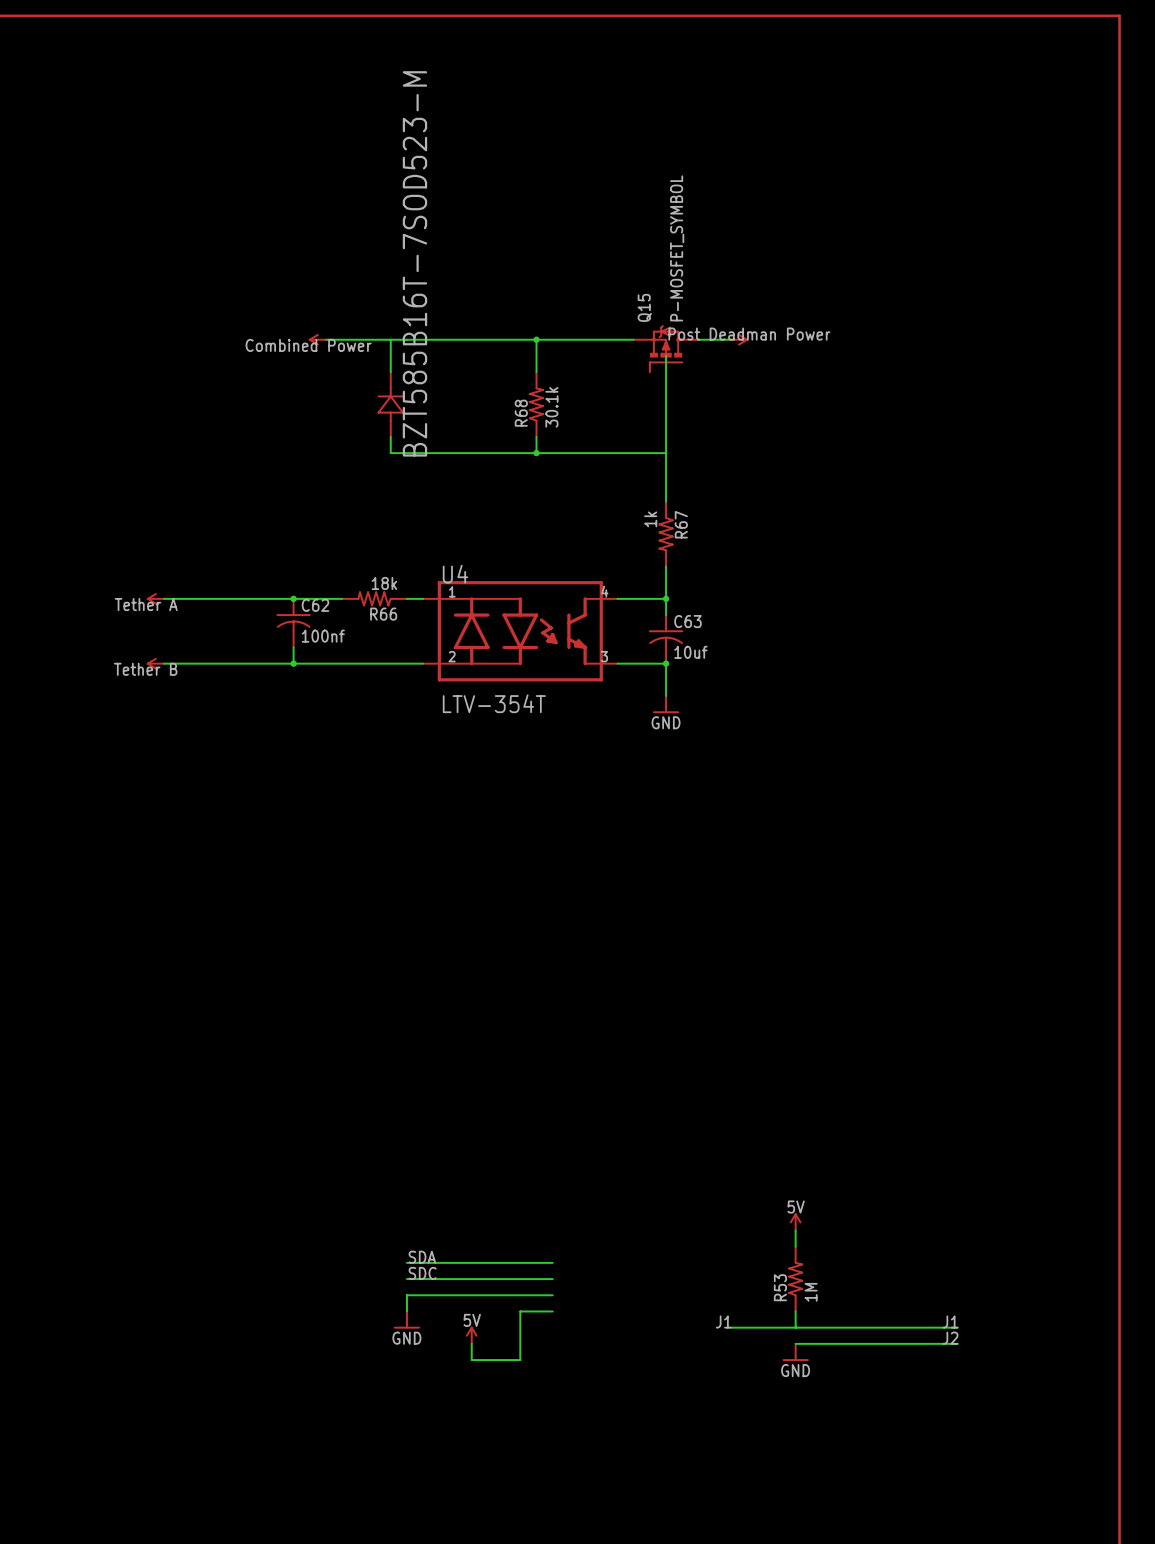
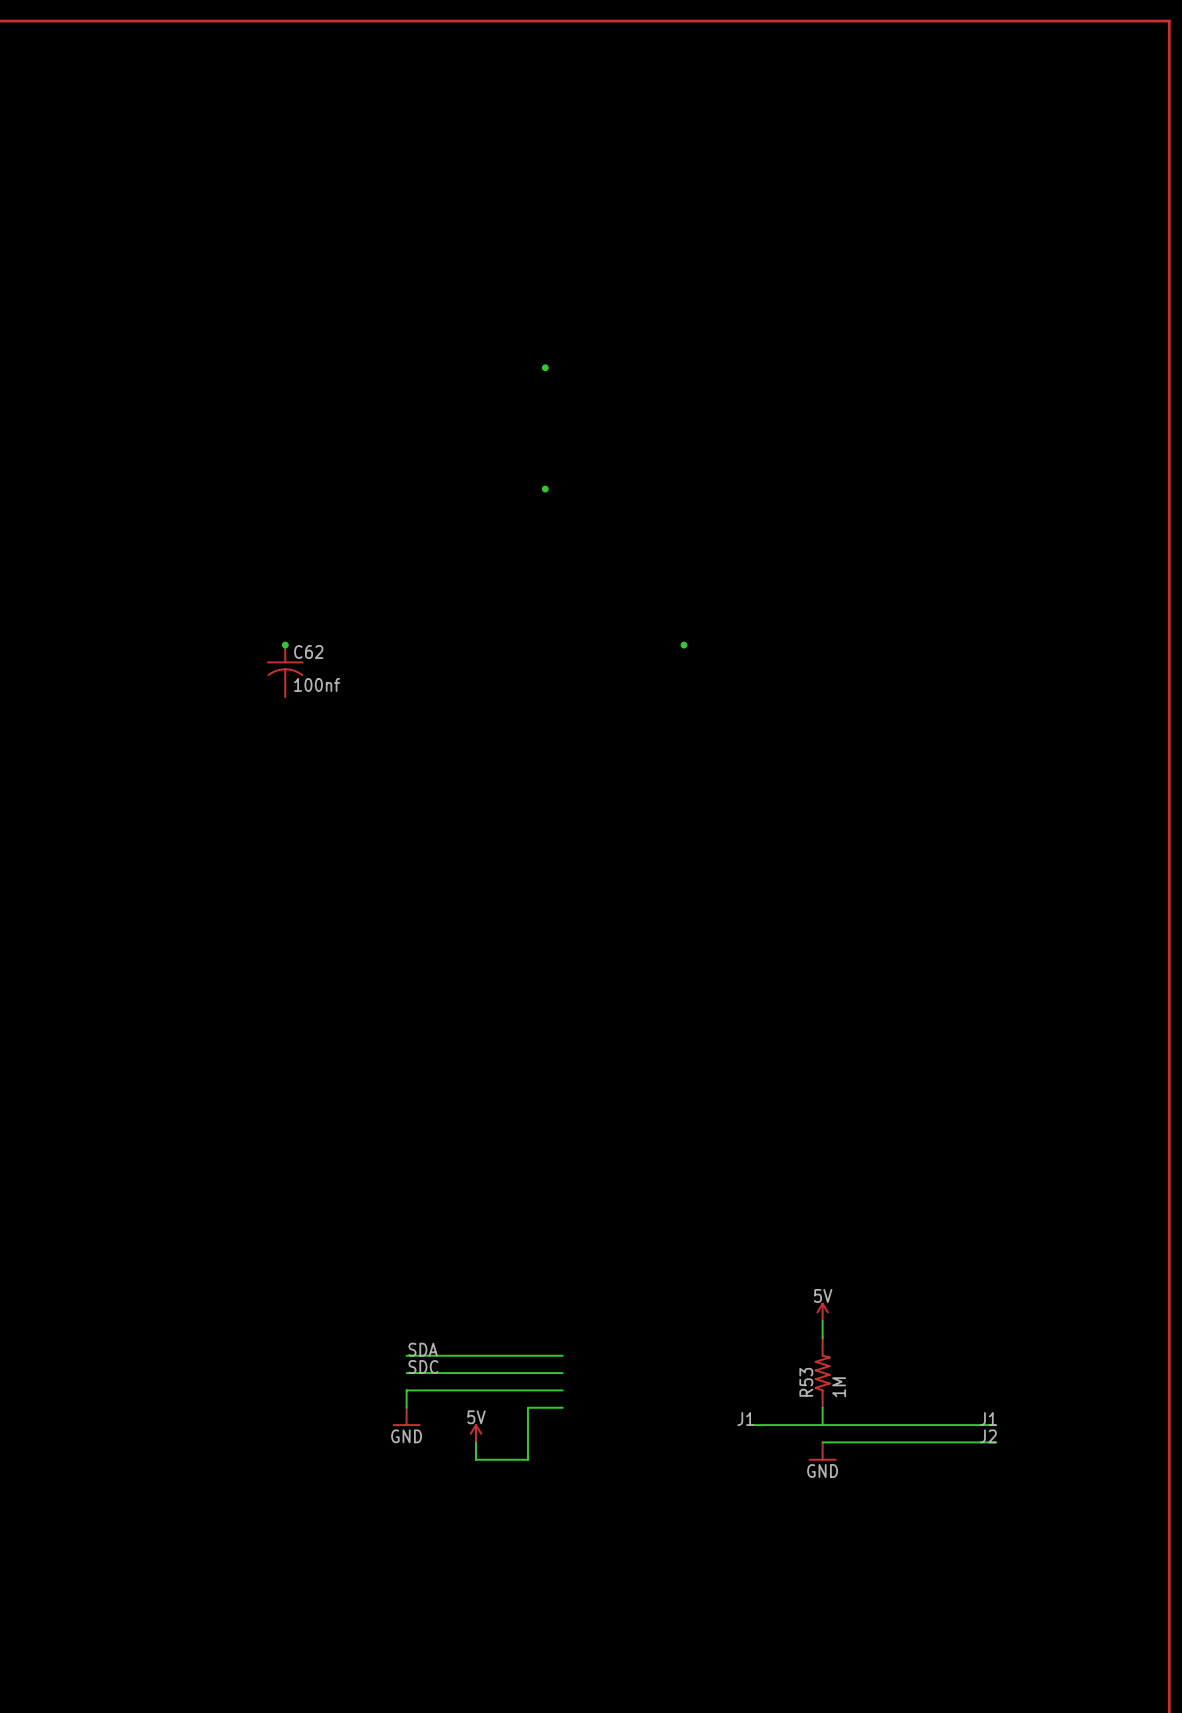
power symbol: Combined Power (317, 339) -> none
wire: (325, 339) (633, 339) -> none
wire: (390, 339) (390, 372) -> none
wire: (536, 339) (536, 372) -> none
wire: (698, 339) (730, 339) -> none
power symbol: Post Deadman Power (739, 339) -> none
Q15: P-MOSFET_SYMBOL (666, 349) -> none
wire: (666, 355) (666, 501) -> none
part: BZT585B16T-7SOD523-M (390, 404) -> none
R68: 30.1k (536, 404) -> none
wire: (390, 436) (390, 453) (666, 453) -> none
wire: (536, 436) (536, 453) -> none
R67: 1k (666, 534) -> none
wire: (666, 566) (666, 615) -> none
power symbol: Tether A (155, 598) -> none
wire: (164, 598) (342, 598) -> none
R66: 18k (374, 598) -> none
wire: (406, 598) (423, 598) -> none
wire: (617, 598) (666, 598) -> none
U4: (520, 631) -> none
C63: 10uf (666, 639) -> none
wire: (293, 647) (293, 663) -> none
power symbol: Tether B (155, 663) -> none
wire: (164, 663) (423, 663) -> none
junction: (293, 663) -> none
wire: (617, 663) (666, 663) (666, 696) -> none
junction: (666, 663) -> none
power symbol: GND (666, 704) -> none

